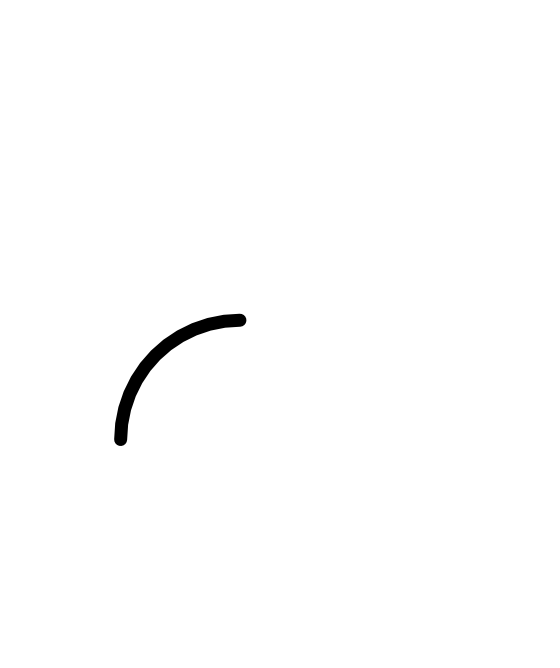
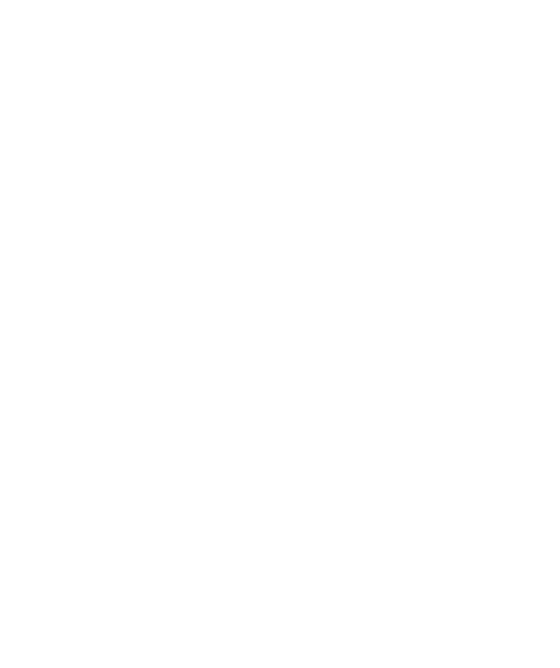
board edge: (239, 320) (209, 324) (194, 329) (167, 344) (155, 355) (145, 366) (129, 393) (124, 408) (120, 439) -> none

